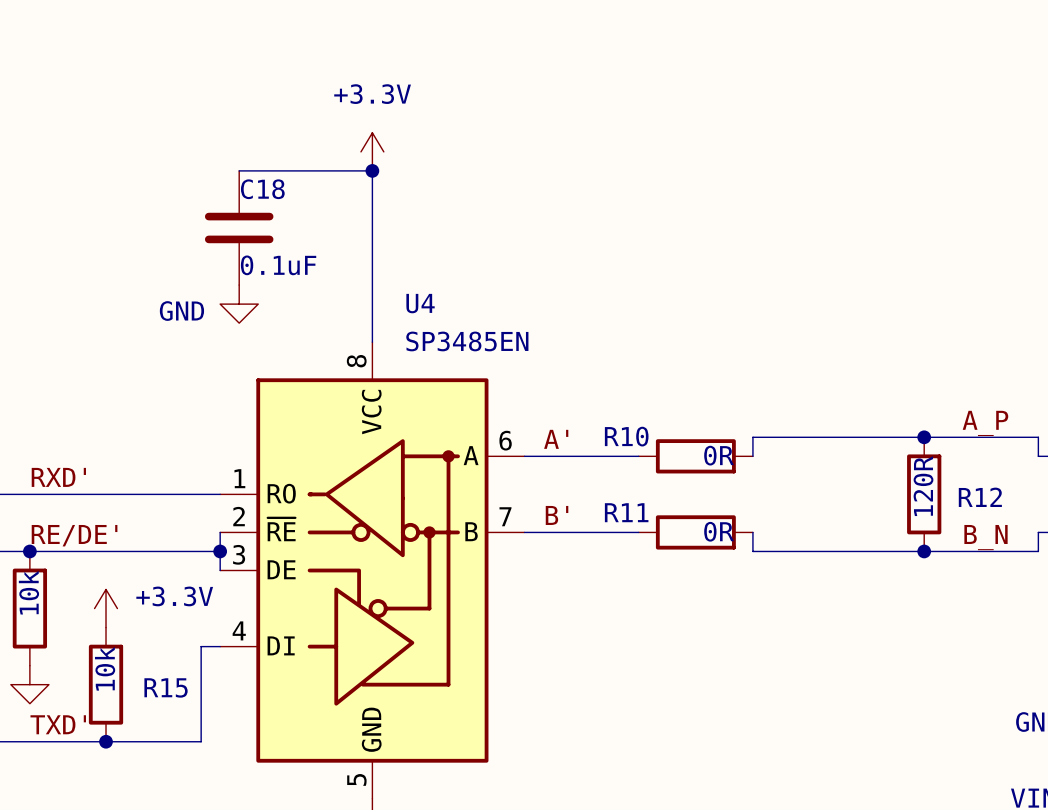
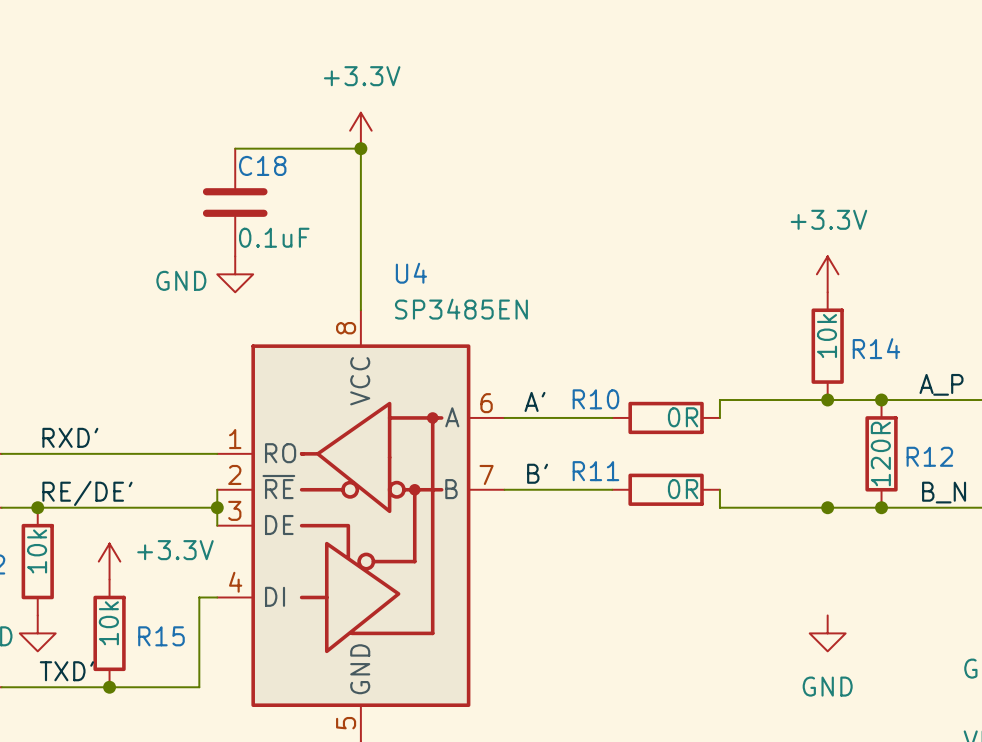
power symbol: none -> +3.3V (827, 274)
R14: none -> 10k (827, 346)
junction: none -> (827, 400)
junction: none -> (827, 507)
power symbol: none -> GND (827, 633)

